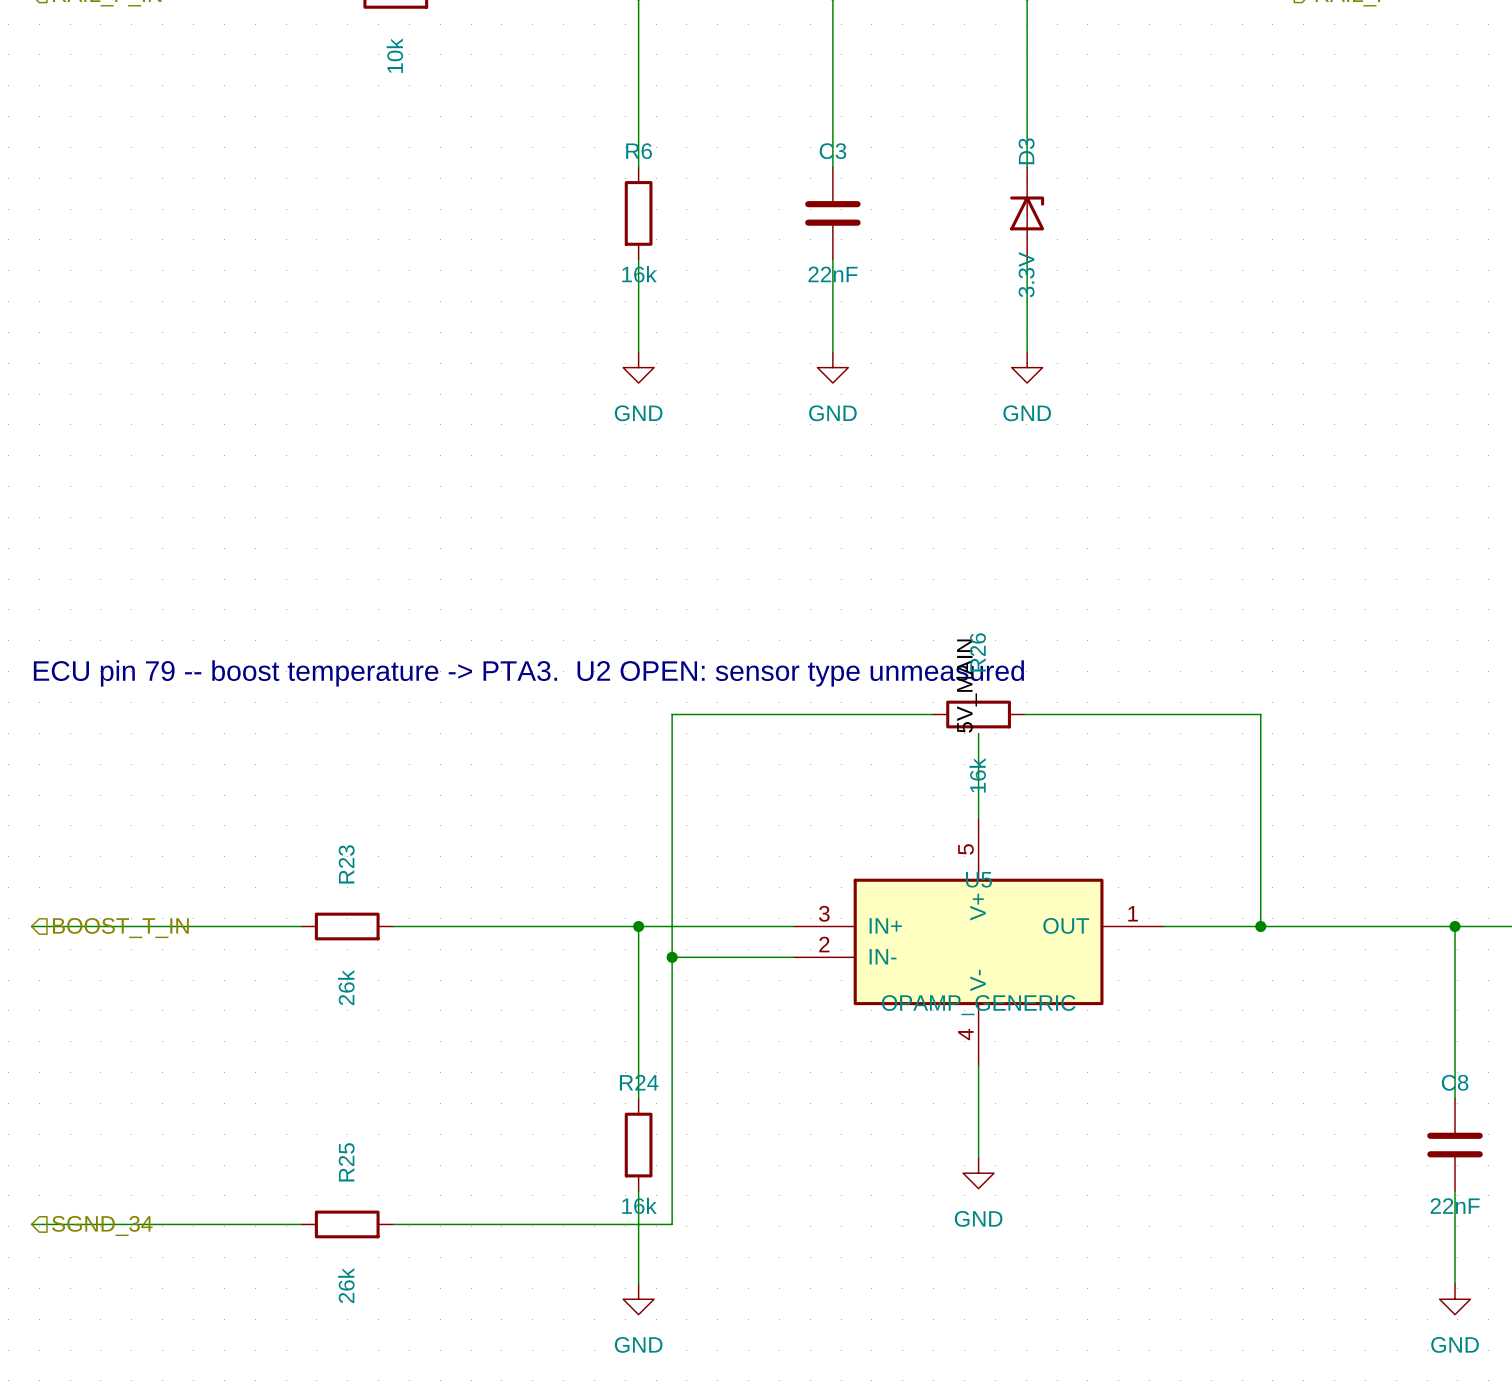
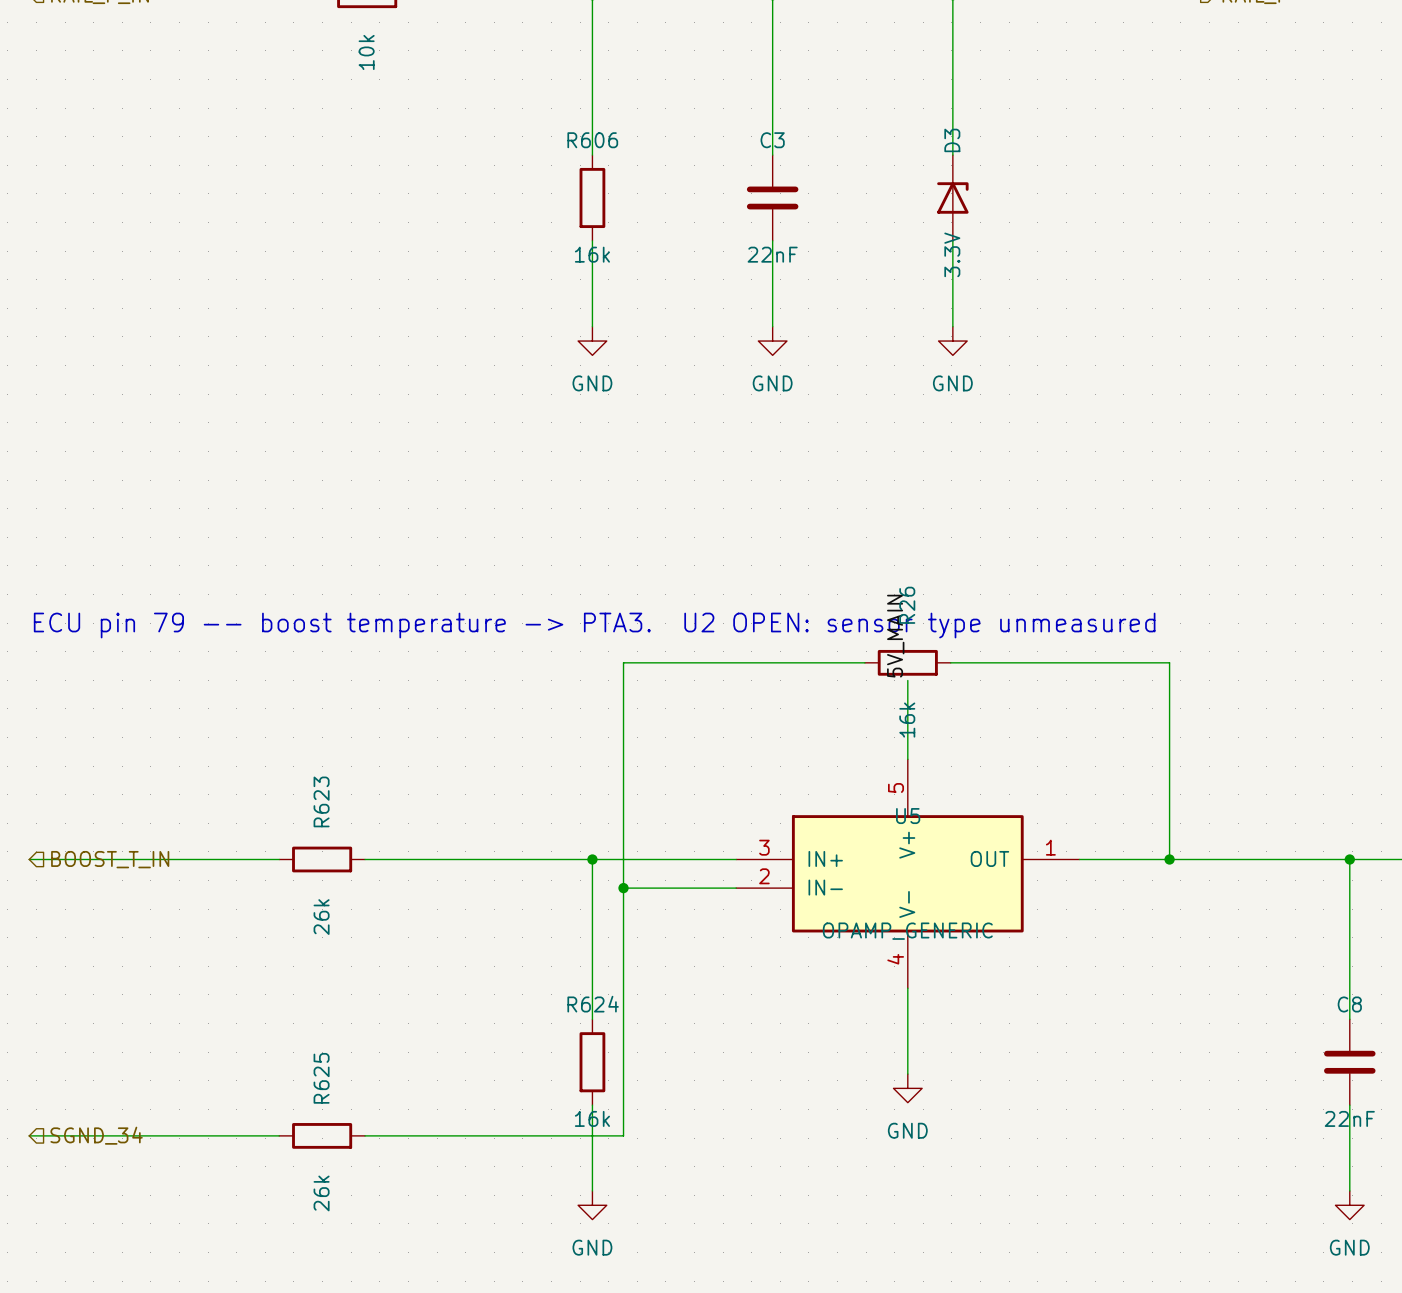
R6 name: R6 (639, 151) -> R606 (592, 140)
R23 name: R23 (346, 864) -> R623 (321, 801)
R24 name: R24 (639, 1082) -> R624 (593, 1004)
R25 name: R25 (346, 1162) -> R625 (321, 1078)

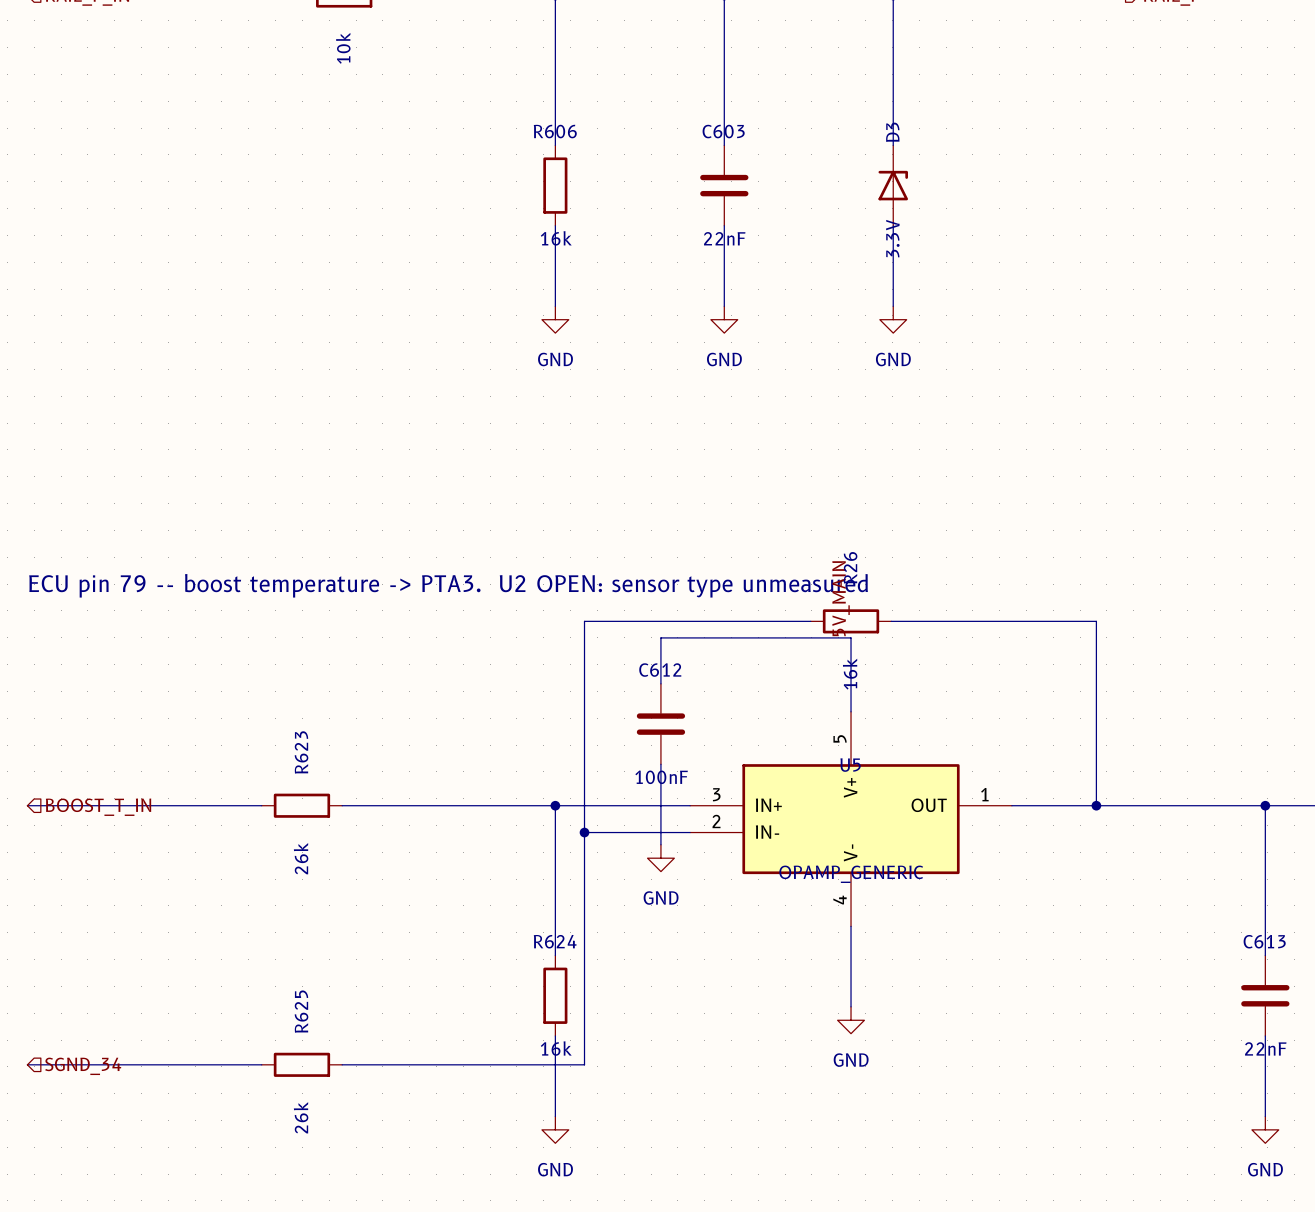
C3 name: C3 (772, 140) -> C603 (723, 131)
wire: none -> (851, 637) (660, 637) (660, 683)
C612: none -> 100nF (660, 724)
wire: none -> (660, 764) (660, 844)
power symbol: none -> GND (660, 858)
C8 name: C8 (1349, 1004) -> C613 (1264, 941)

